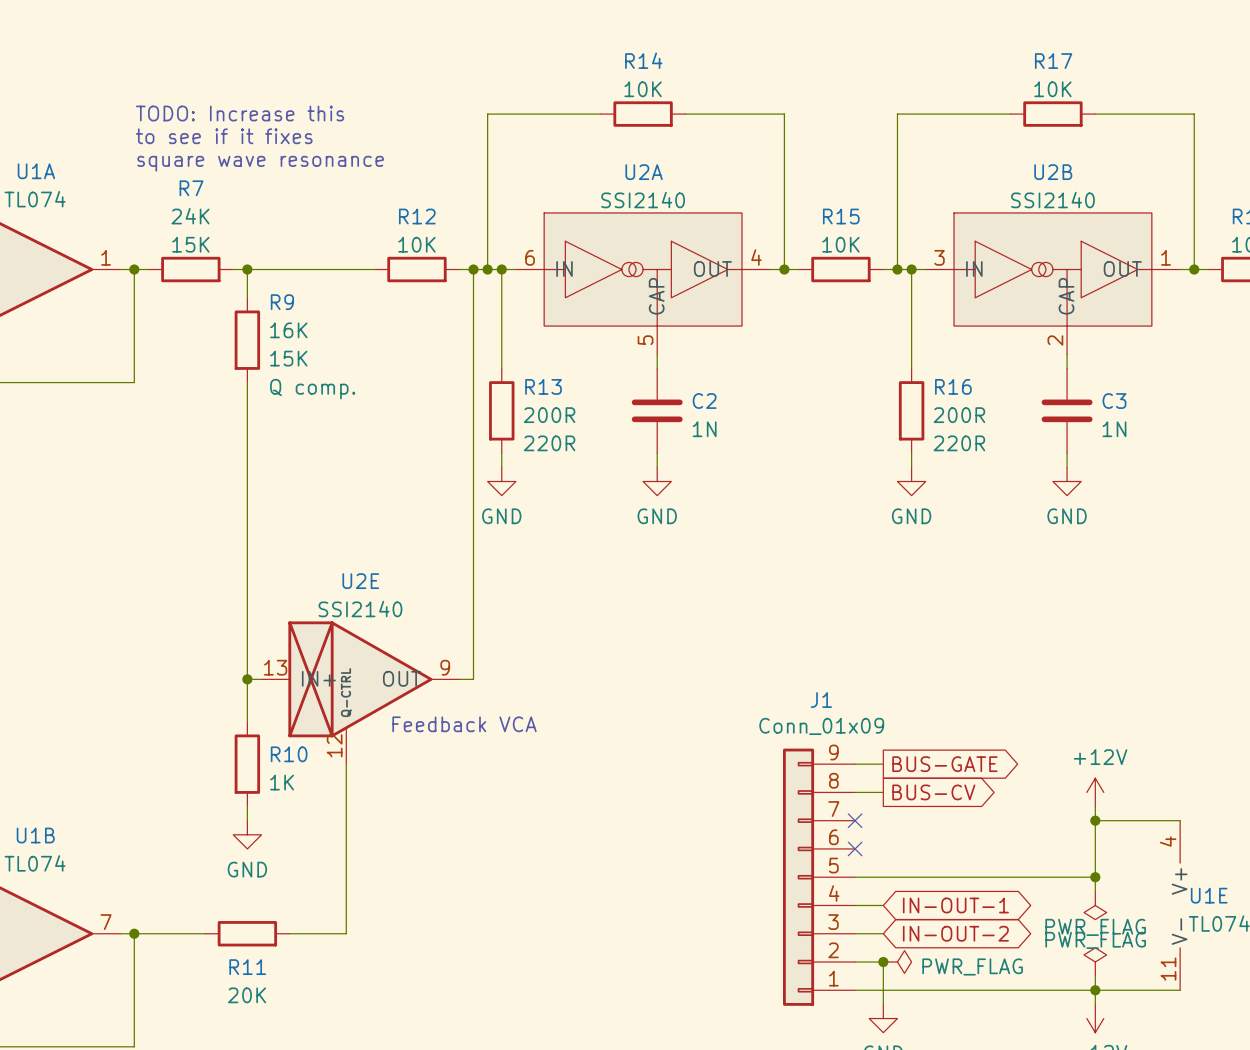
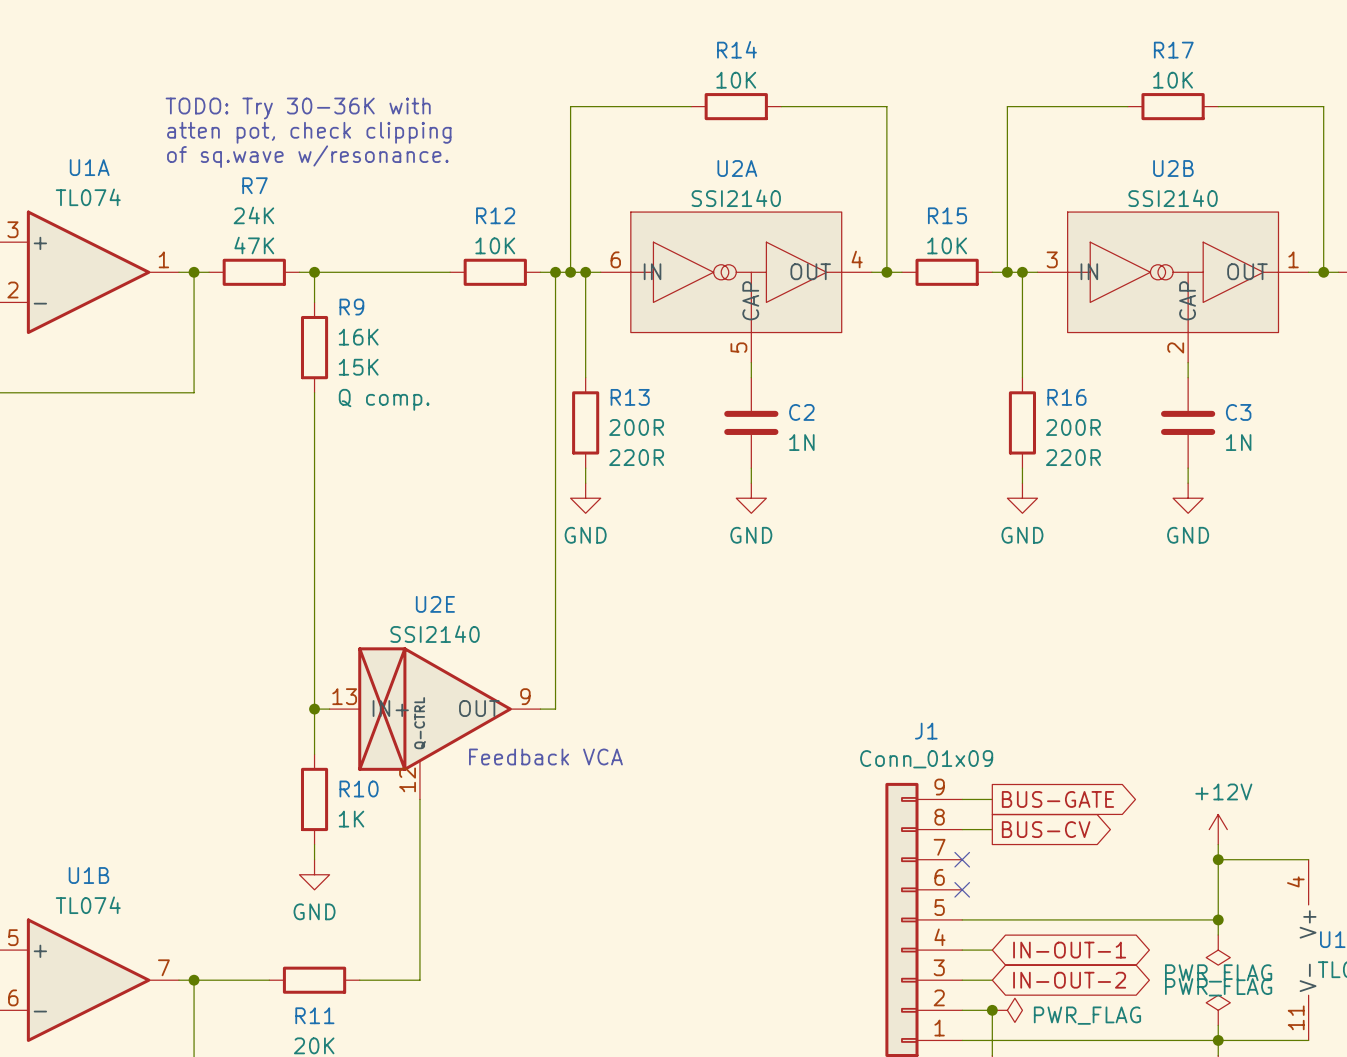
text: TODO: Increase this (240, 113) -> none
text: none -> TODO: Try 30-36K with (298, 108)
text: to see if it fixes (224, 136) -> none
text: none -> atten pot, check clipping (309, 132)
text: square wave resonance (260, 163) -> of sq.wave w/resonance. (307, 156)
R7 text: 15K (190, 244) -> 47K (254, 245)

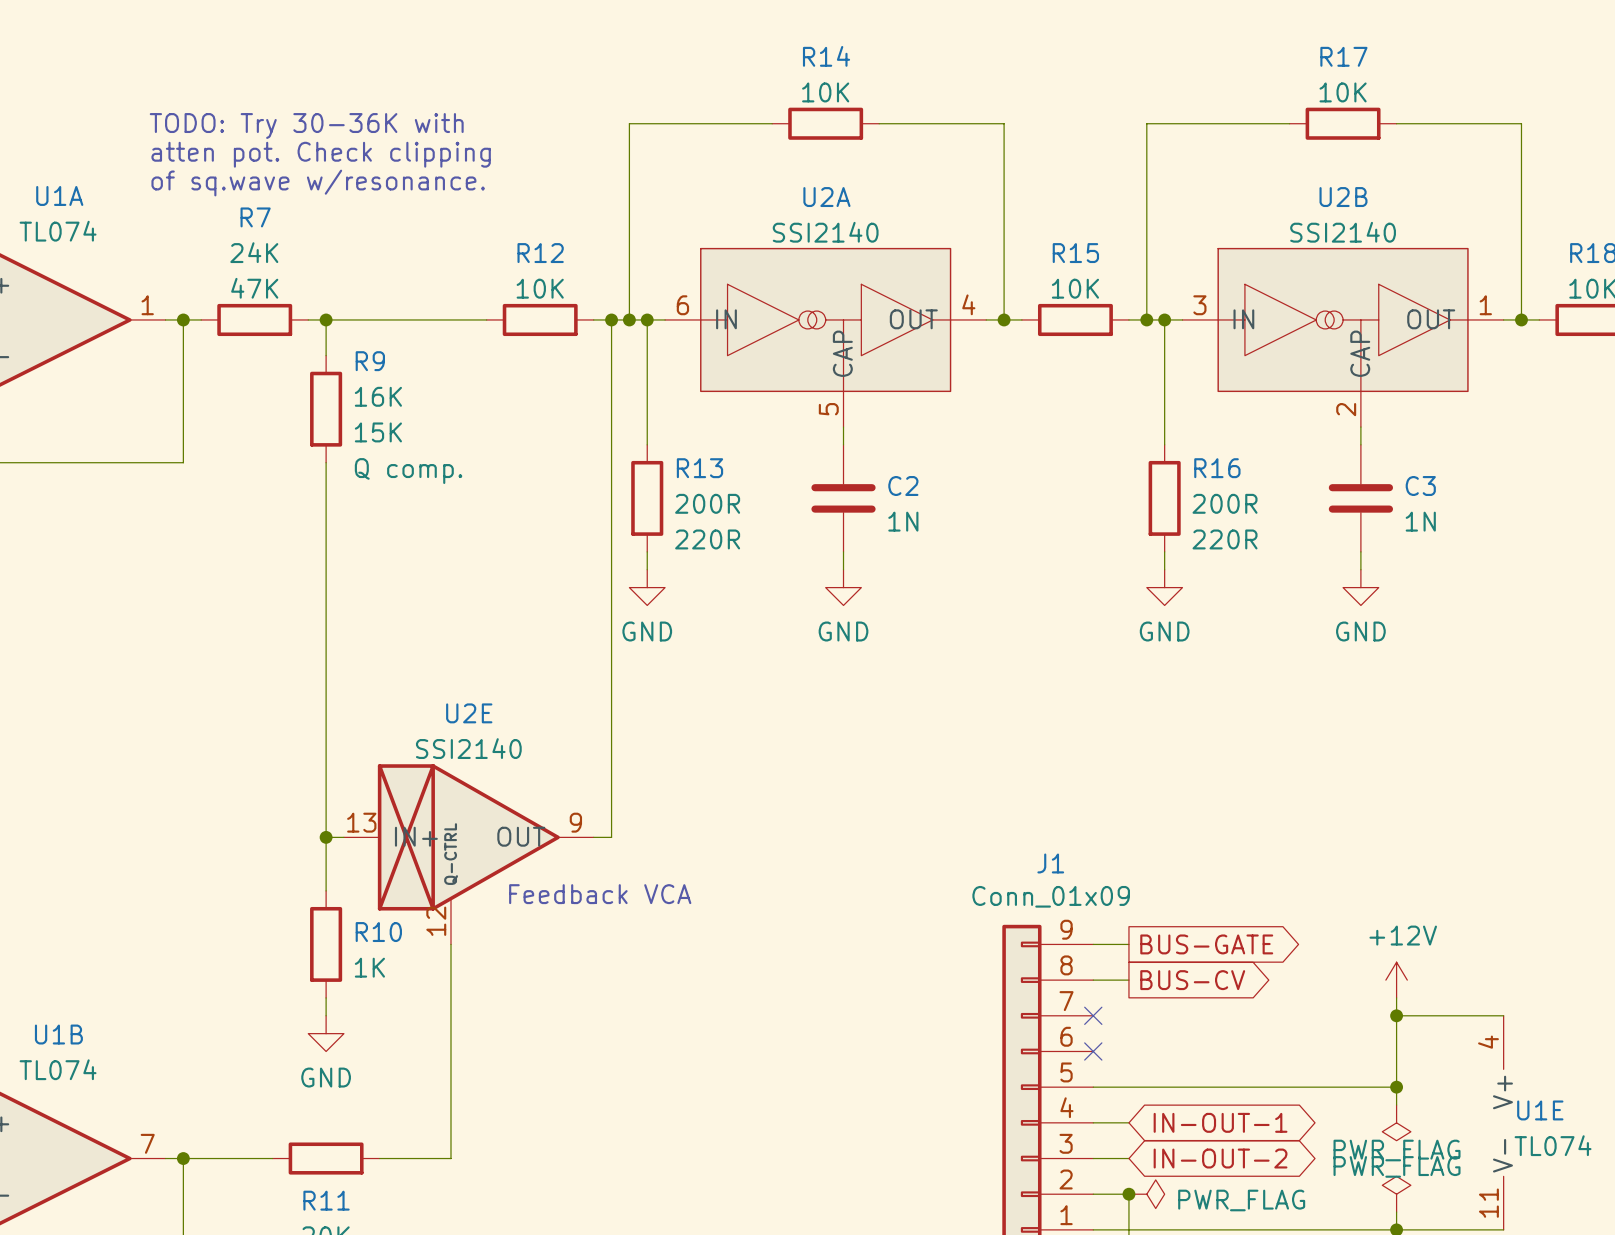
text: atten pot, check clipping (309, 132) -> atten pot. Check clipping (321, 154)

